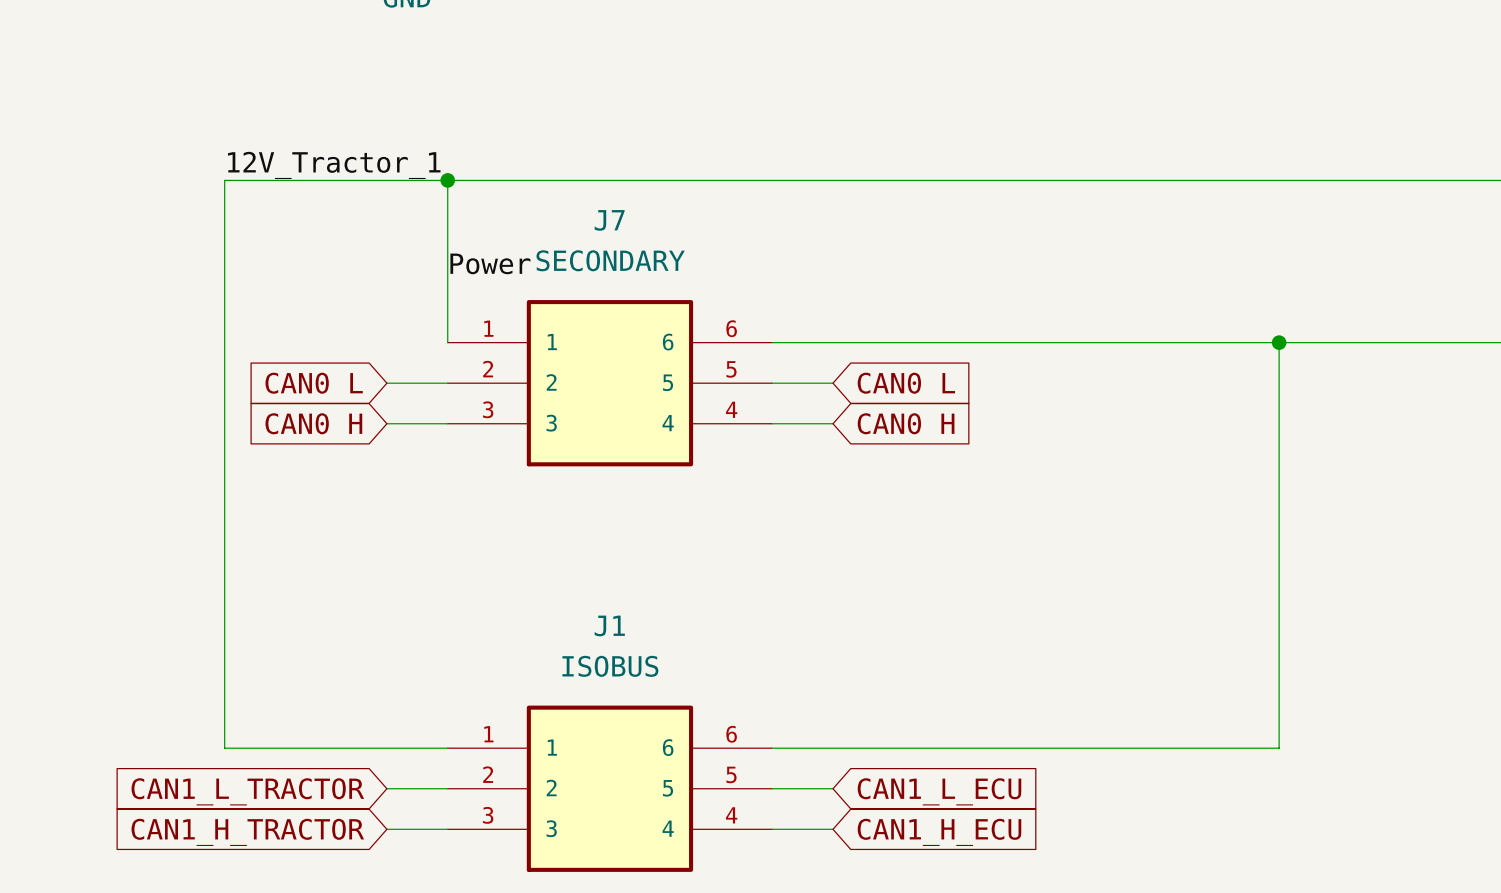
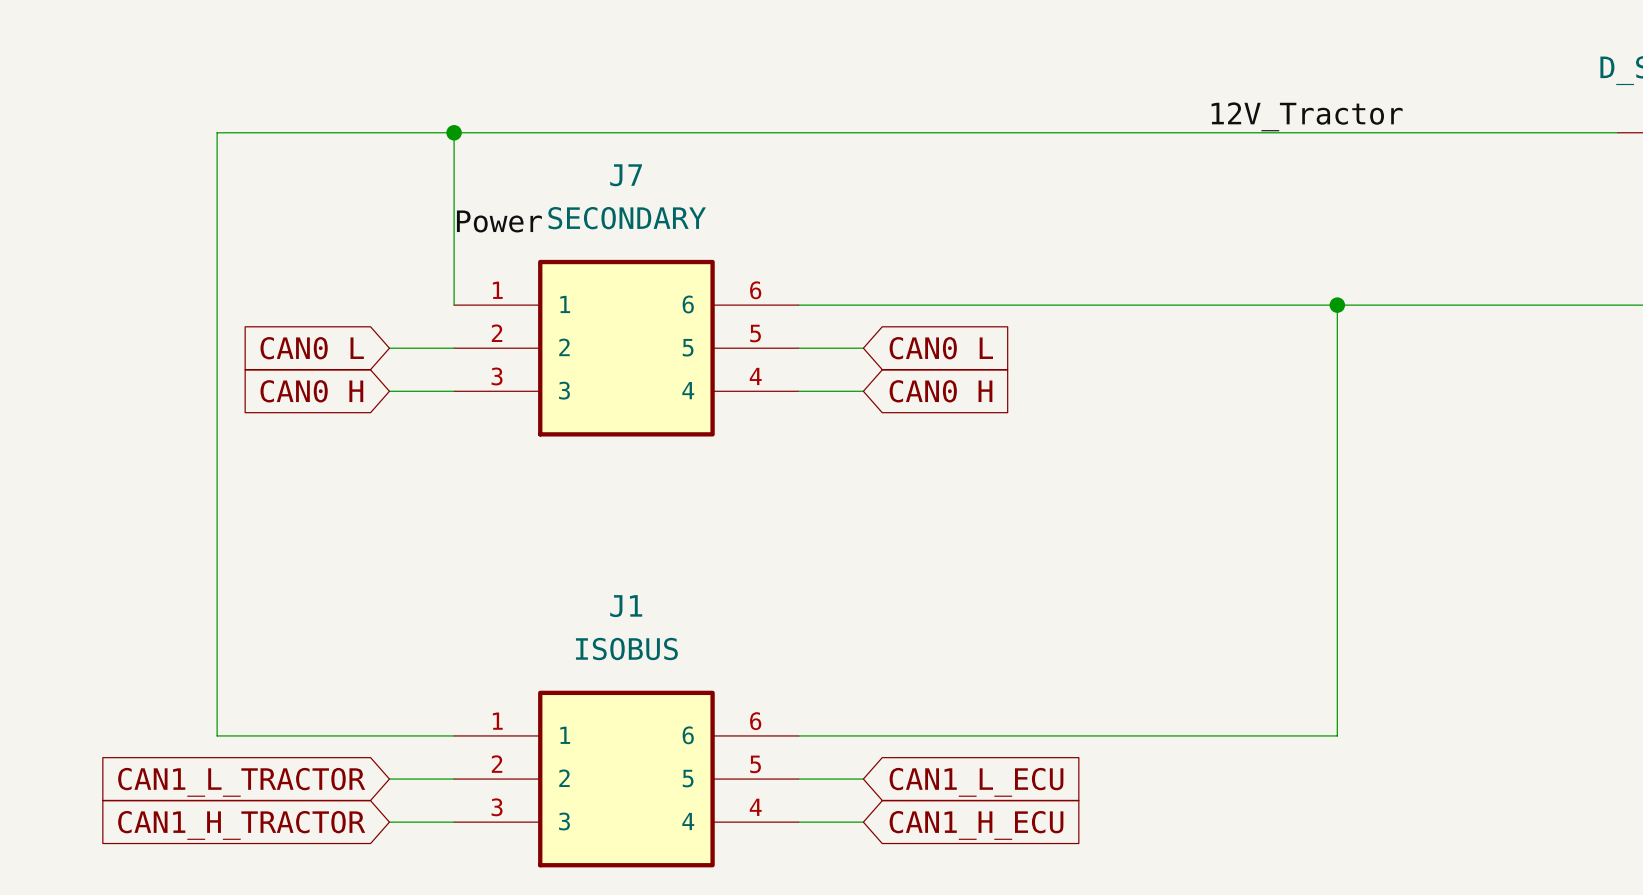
label: 12V_Tractor_1 (334, 165) -> none
label: none -> 12V_Tractor (1307, 116)

